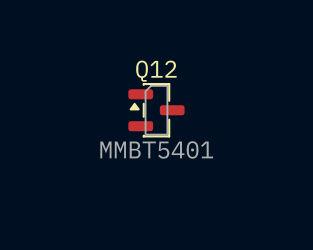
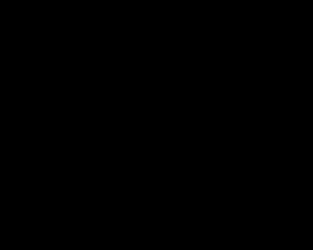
Q12: MMBT5401 (156, 110) -> none

